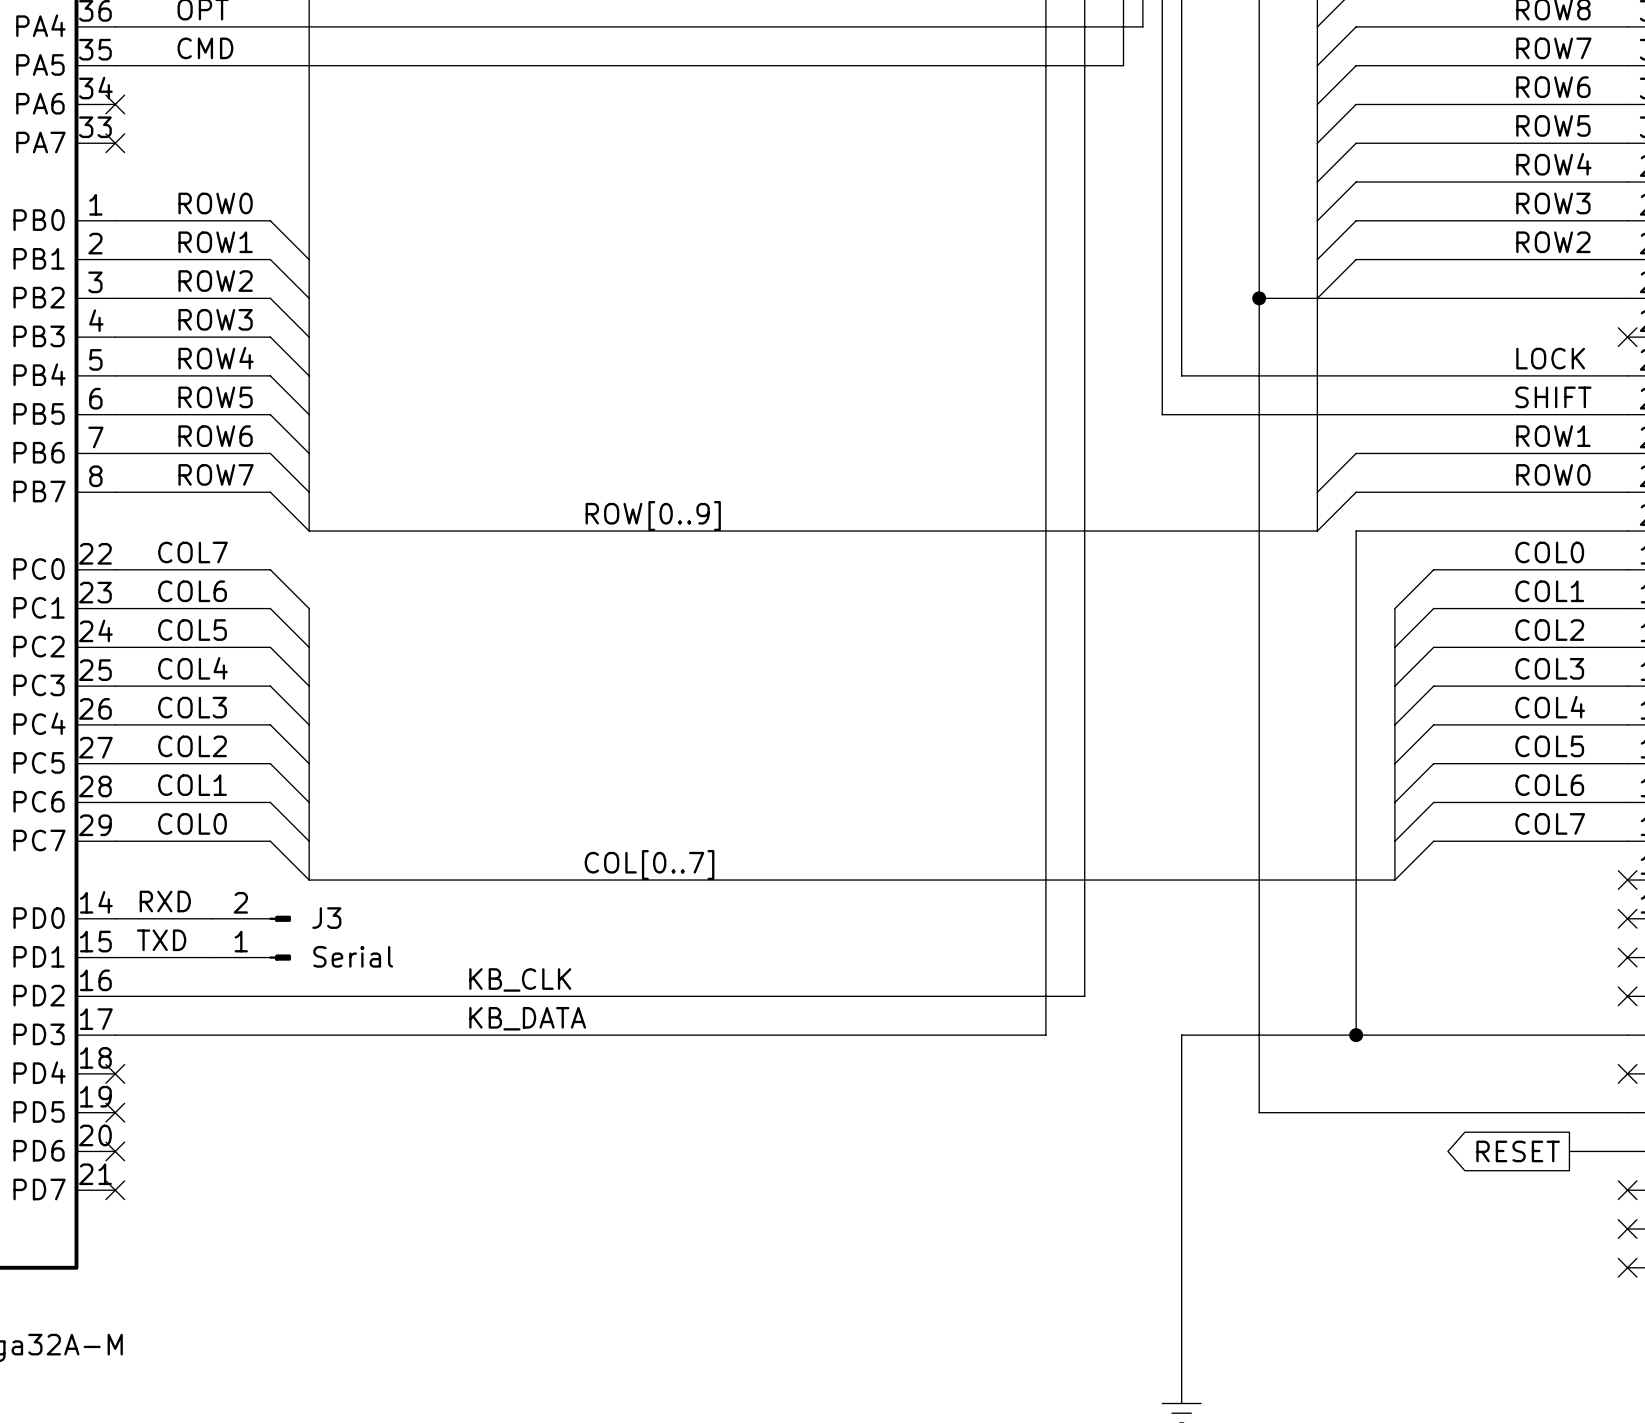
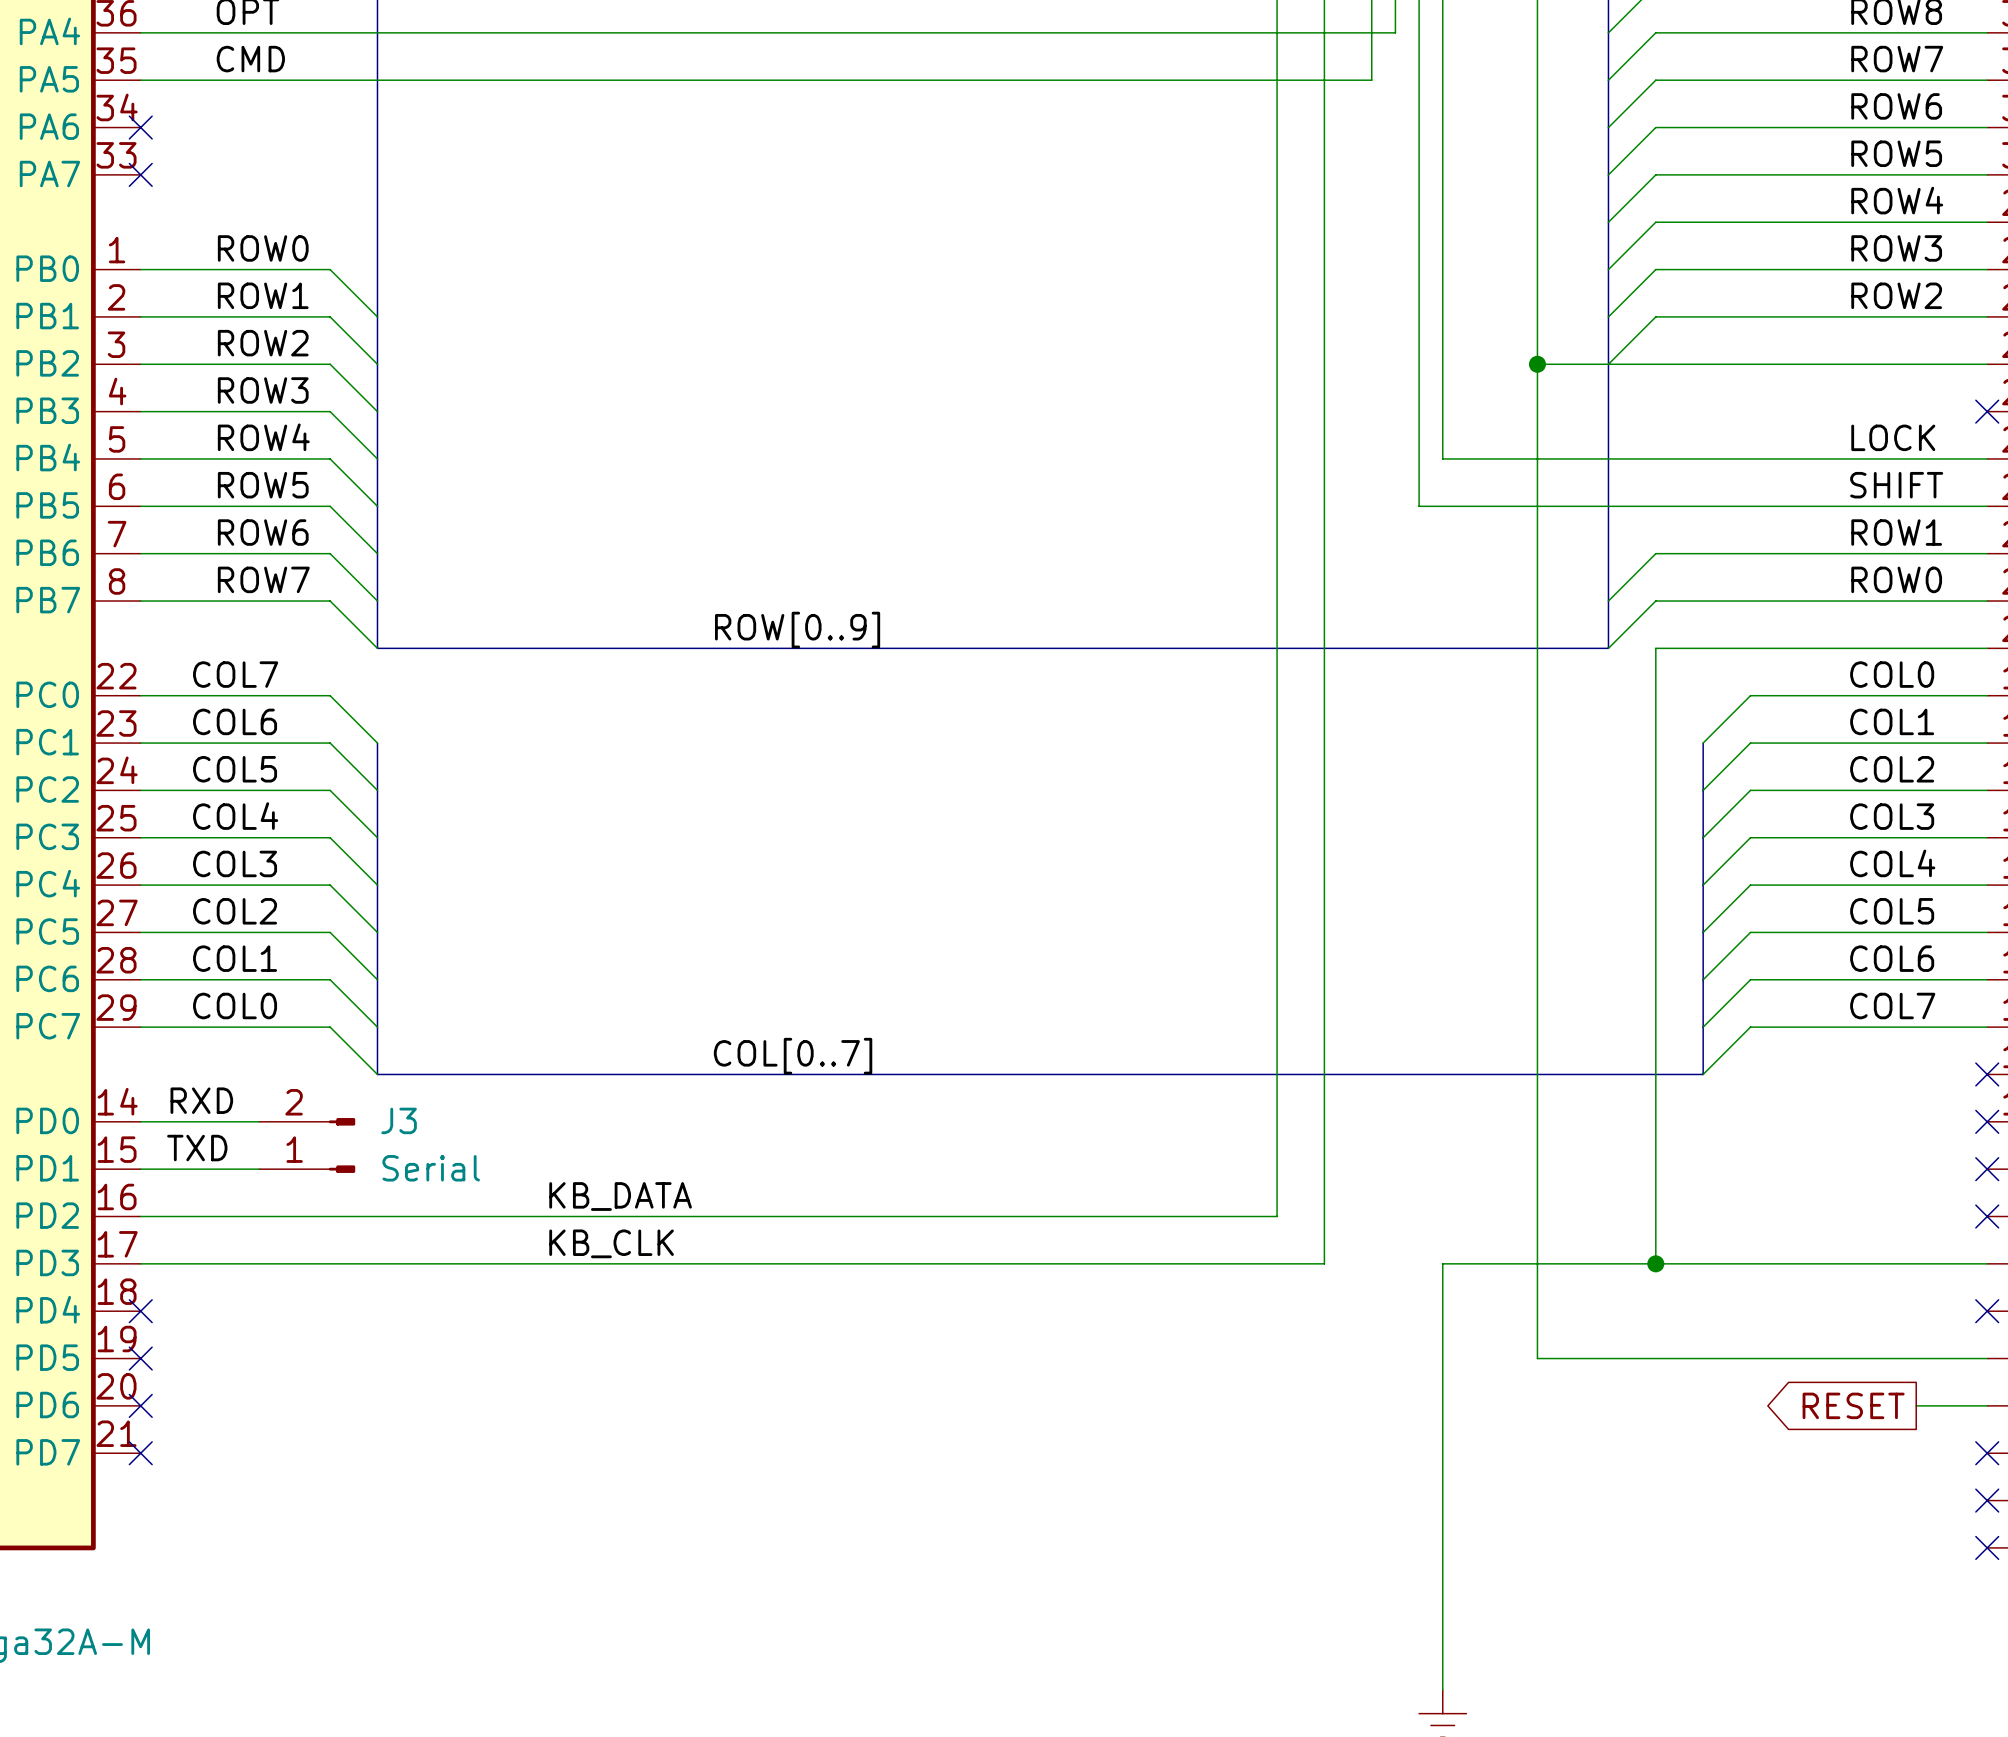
label position: KB_CLK (520, 979) -> KB_CLK (611, 1243)
wire: (1084, 996) (1045, 996) (1045, 1035) -> (1324, 1216) (1324, 1263) (1277, 1263)
label position: KB_DATA (527, 1018) -> KB_DATA (620, 1196)

